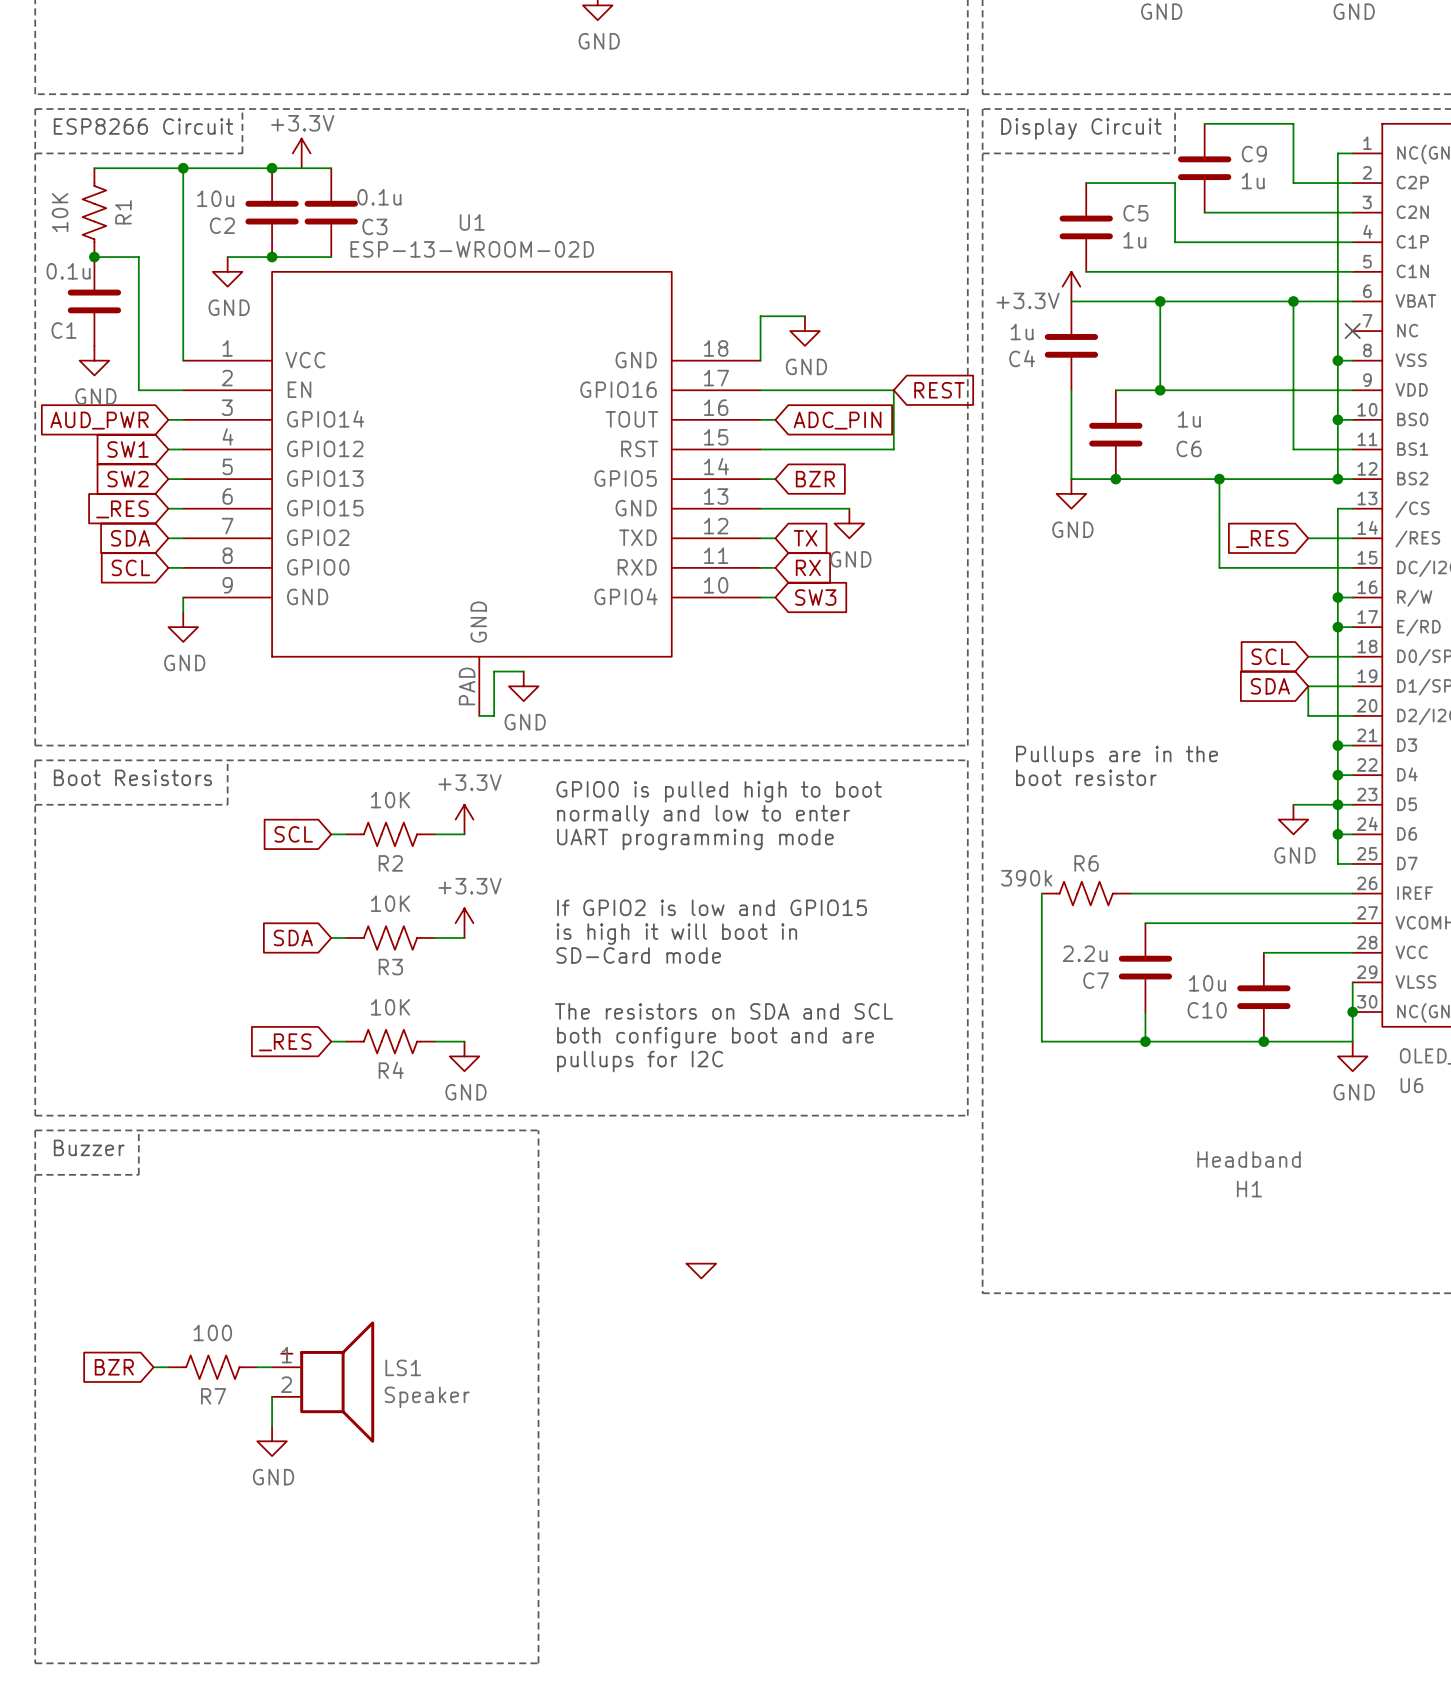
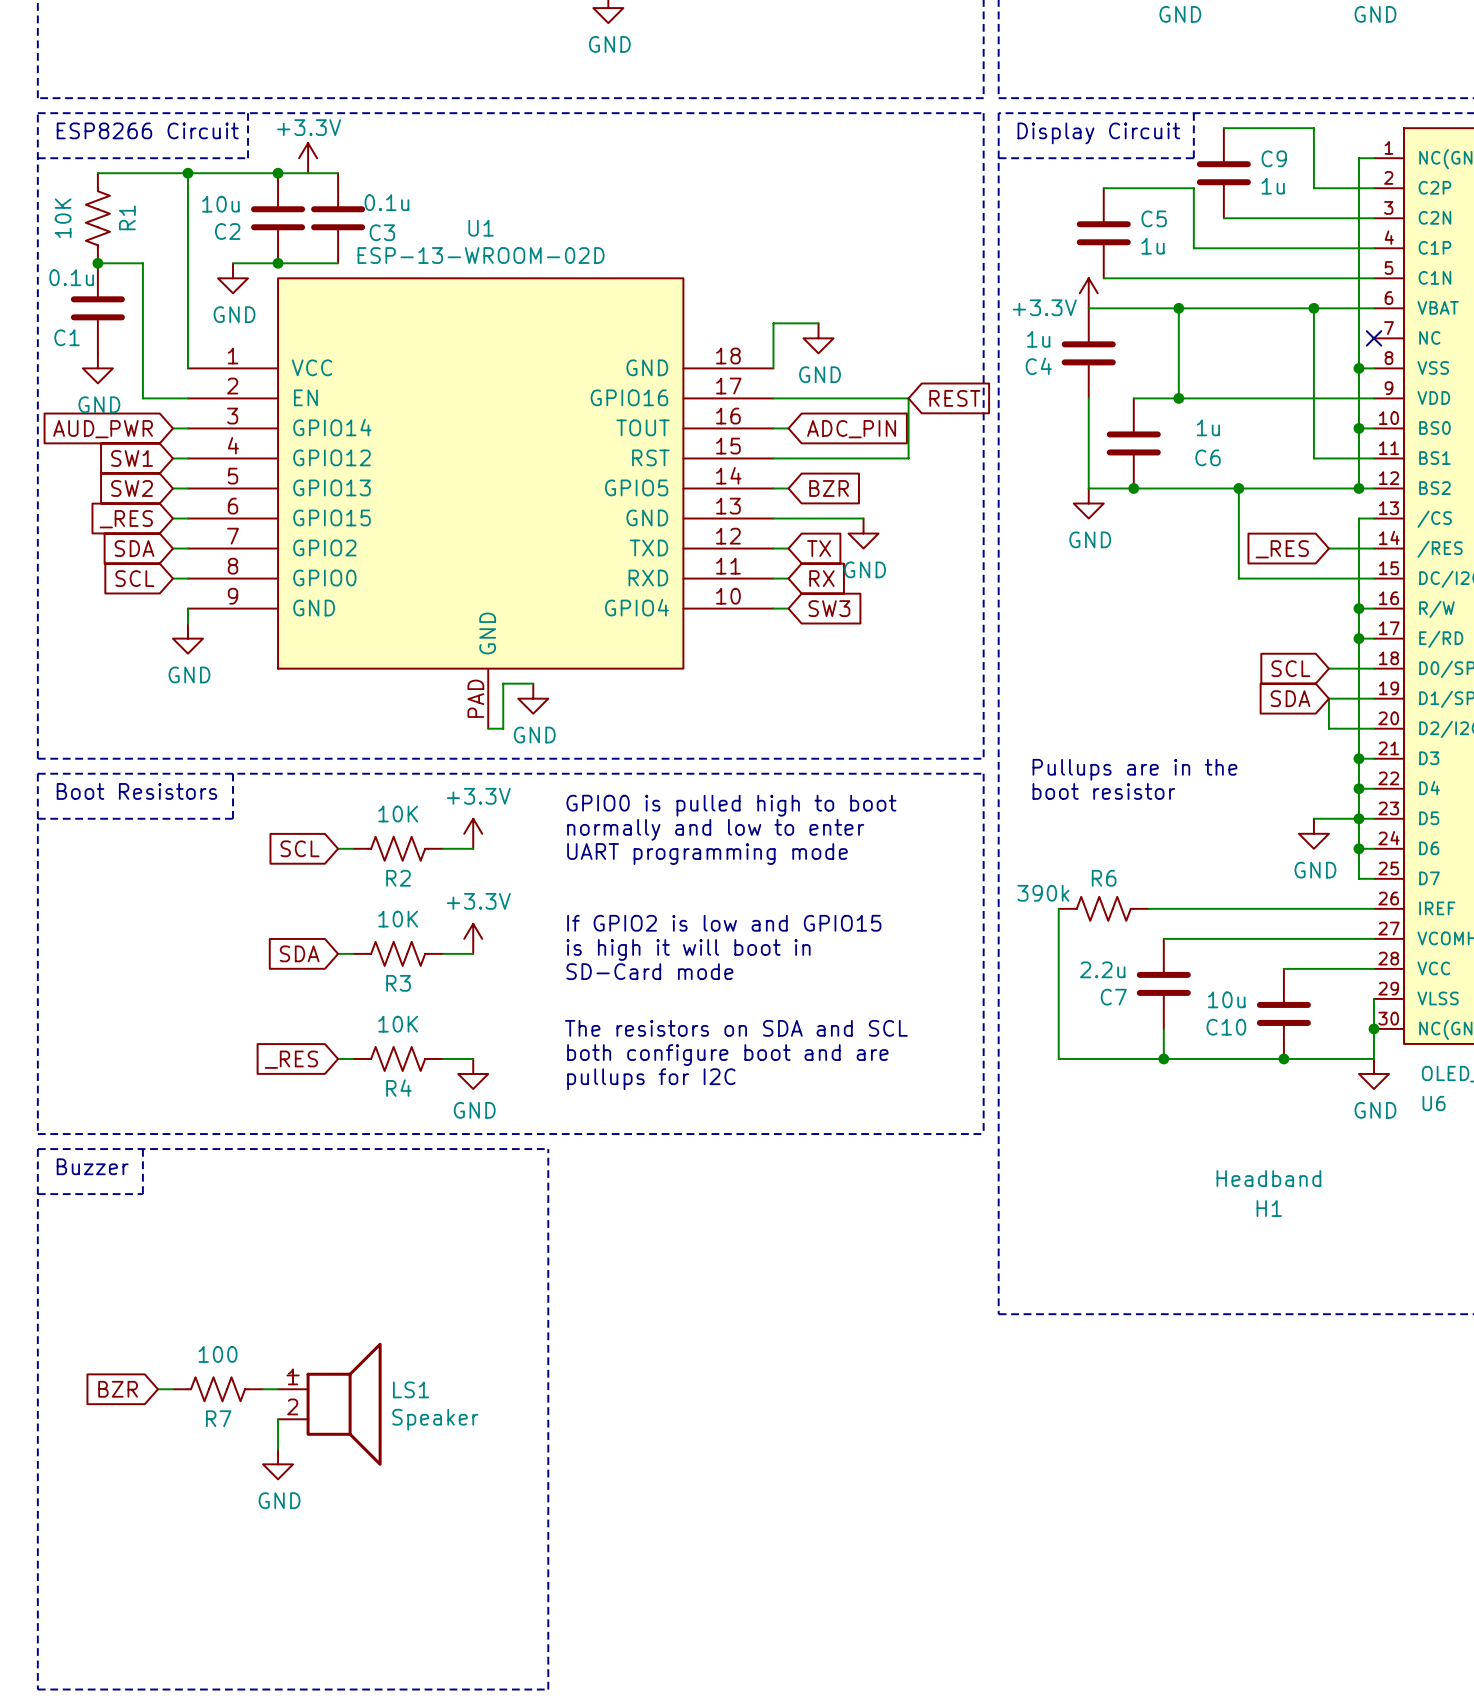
power symbol: (701, 1271) -> none

